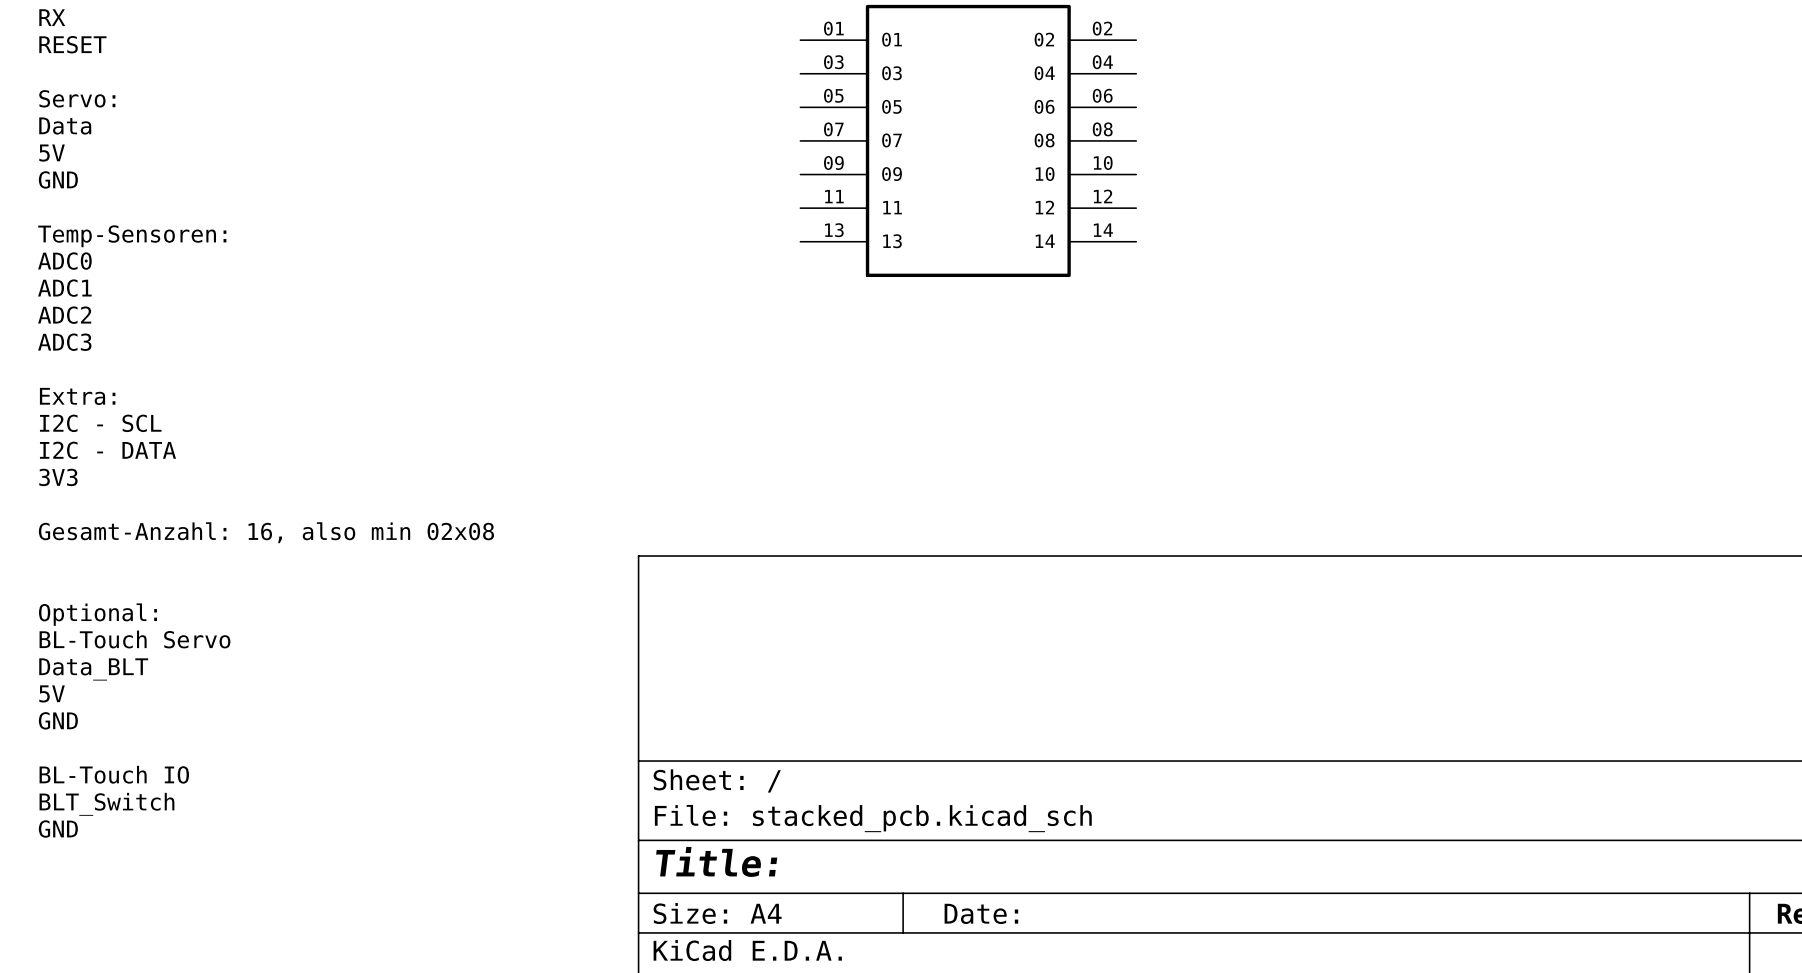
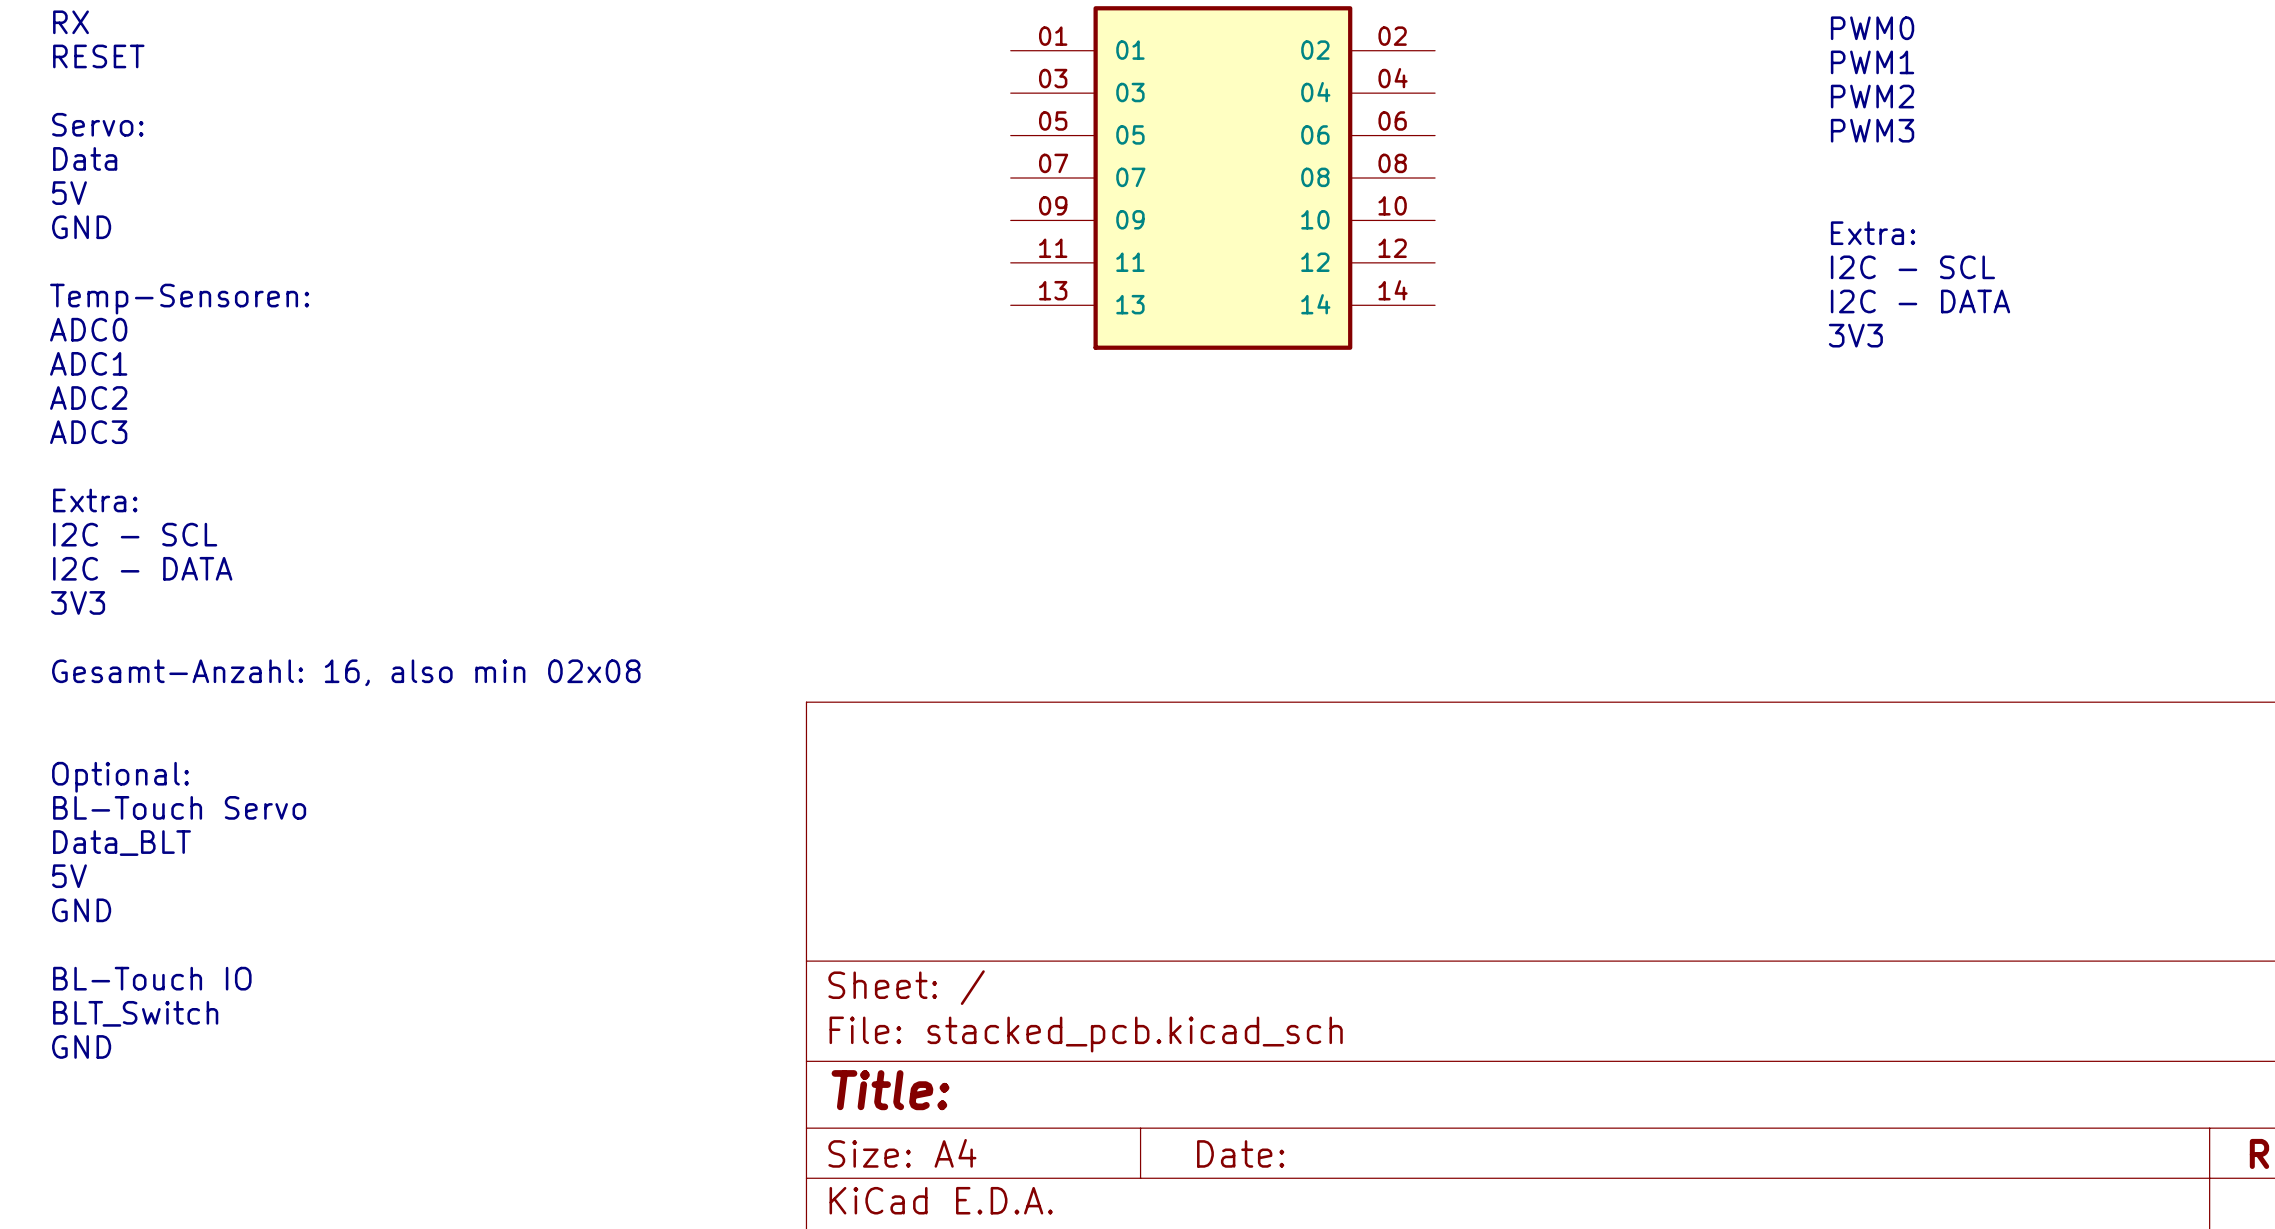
text: none -> PWM0 (1872, 28)
text: none -> PWM1 (1872, 62)
text: none -> PWM2 (1872, 96)
text: none -> PWM3 (1872, 130)
text: none -> Extra: (1873, 233)
text: none -> I2C - SCL (1912, 267)
text: none -> I2C - DATA (1920, 301)
text: none -> 3V3 (1855, 335)

